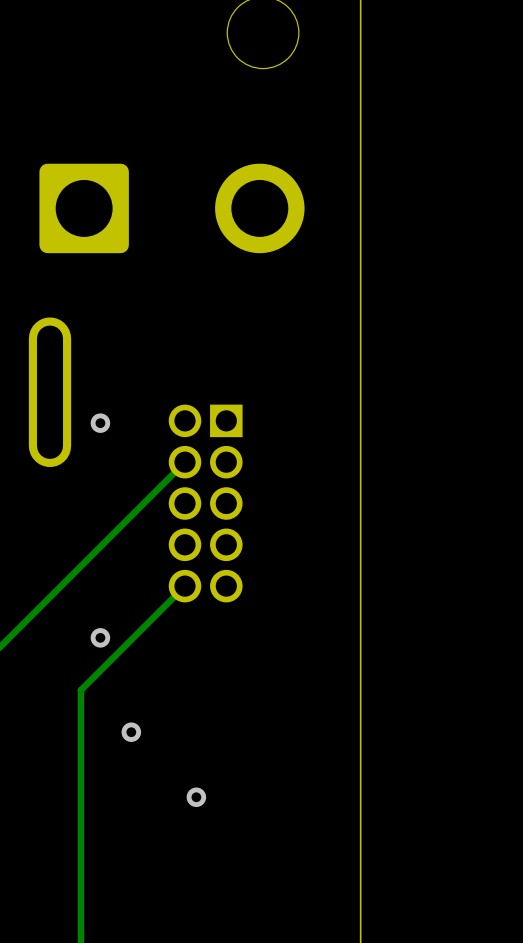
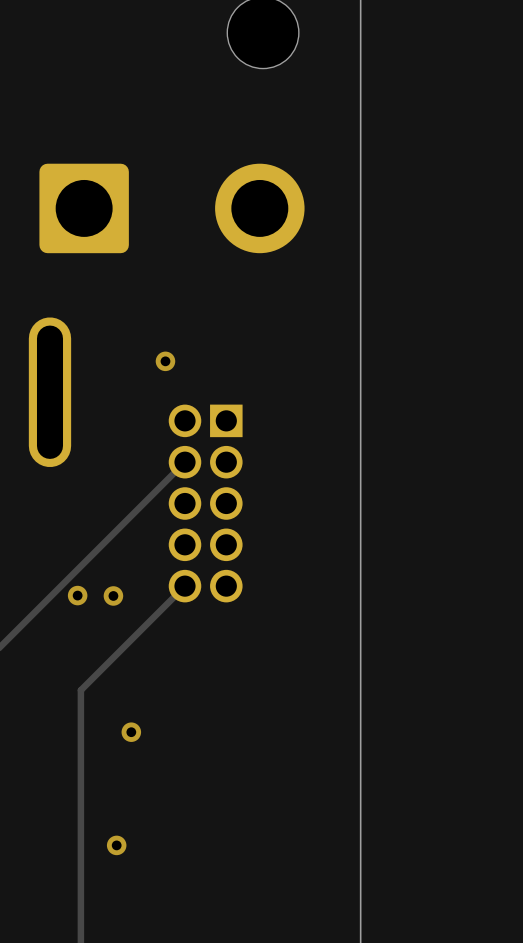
via: none -> (165, 361)
via: (100, 423) -> none
via: none -> (77, 595)
via: none -> (113, 595)
via: (100, 637) -> none
via position: (196, 797) -> (116, 845)

